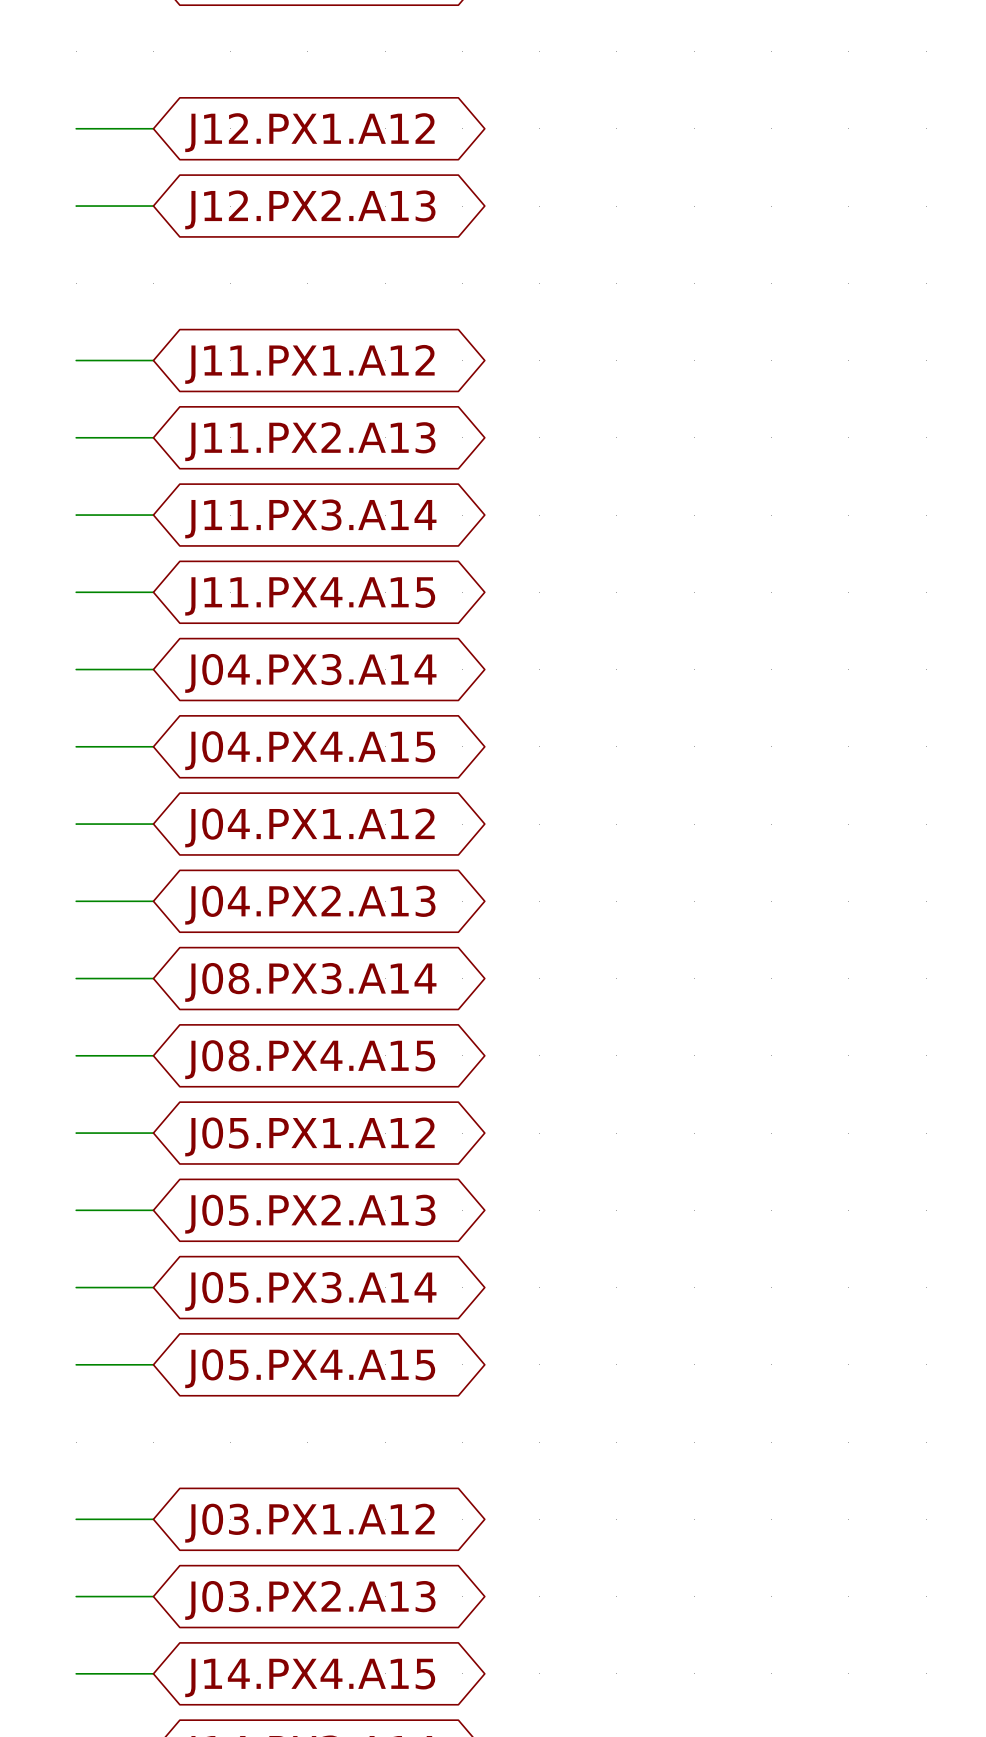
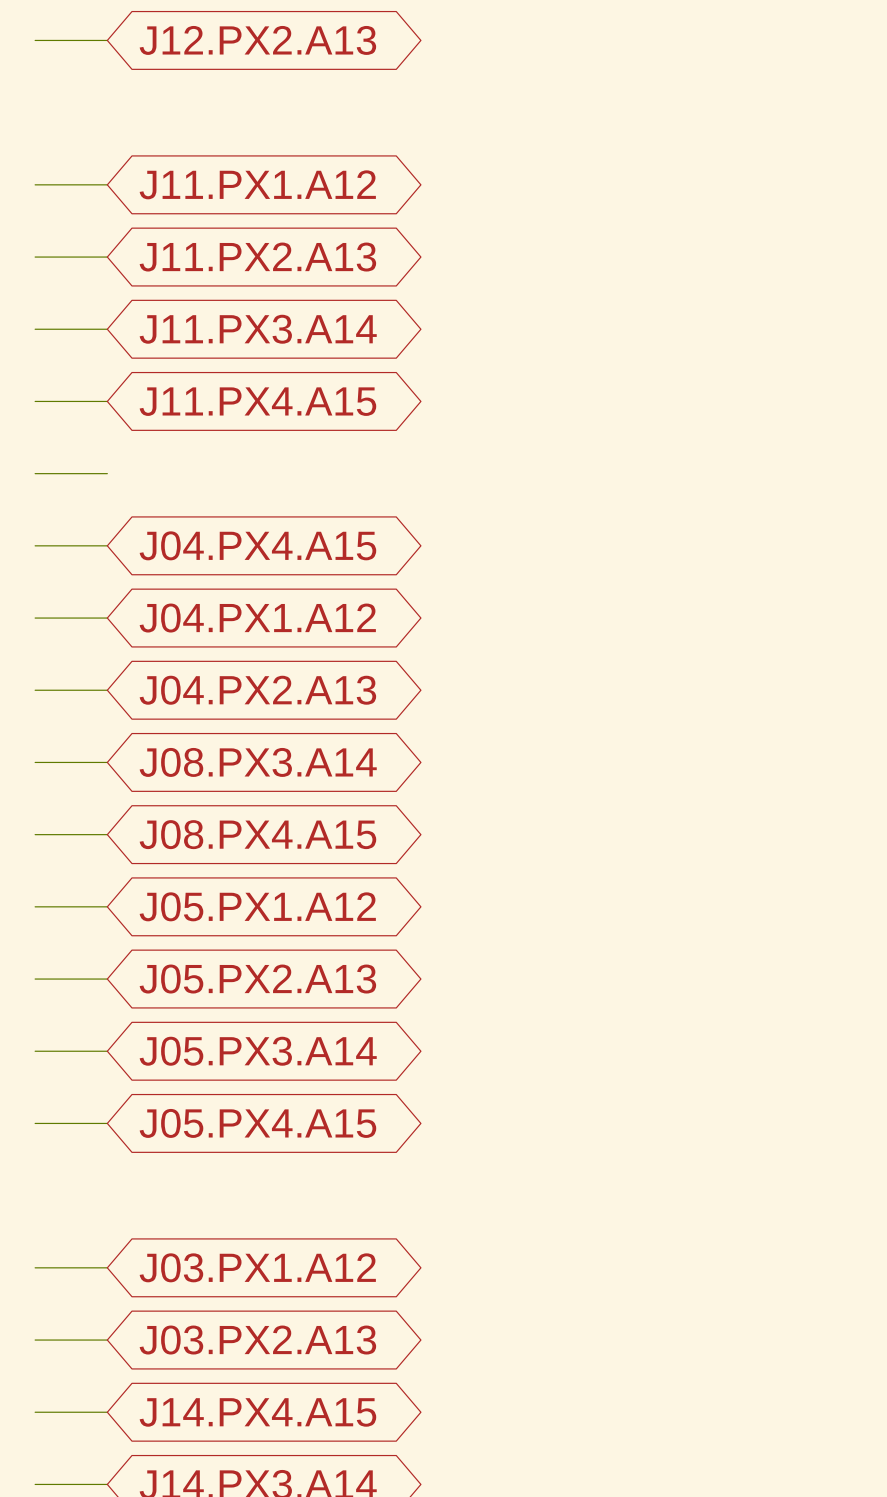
global label: J04.PX3.A14 (310, 673) -> none

